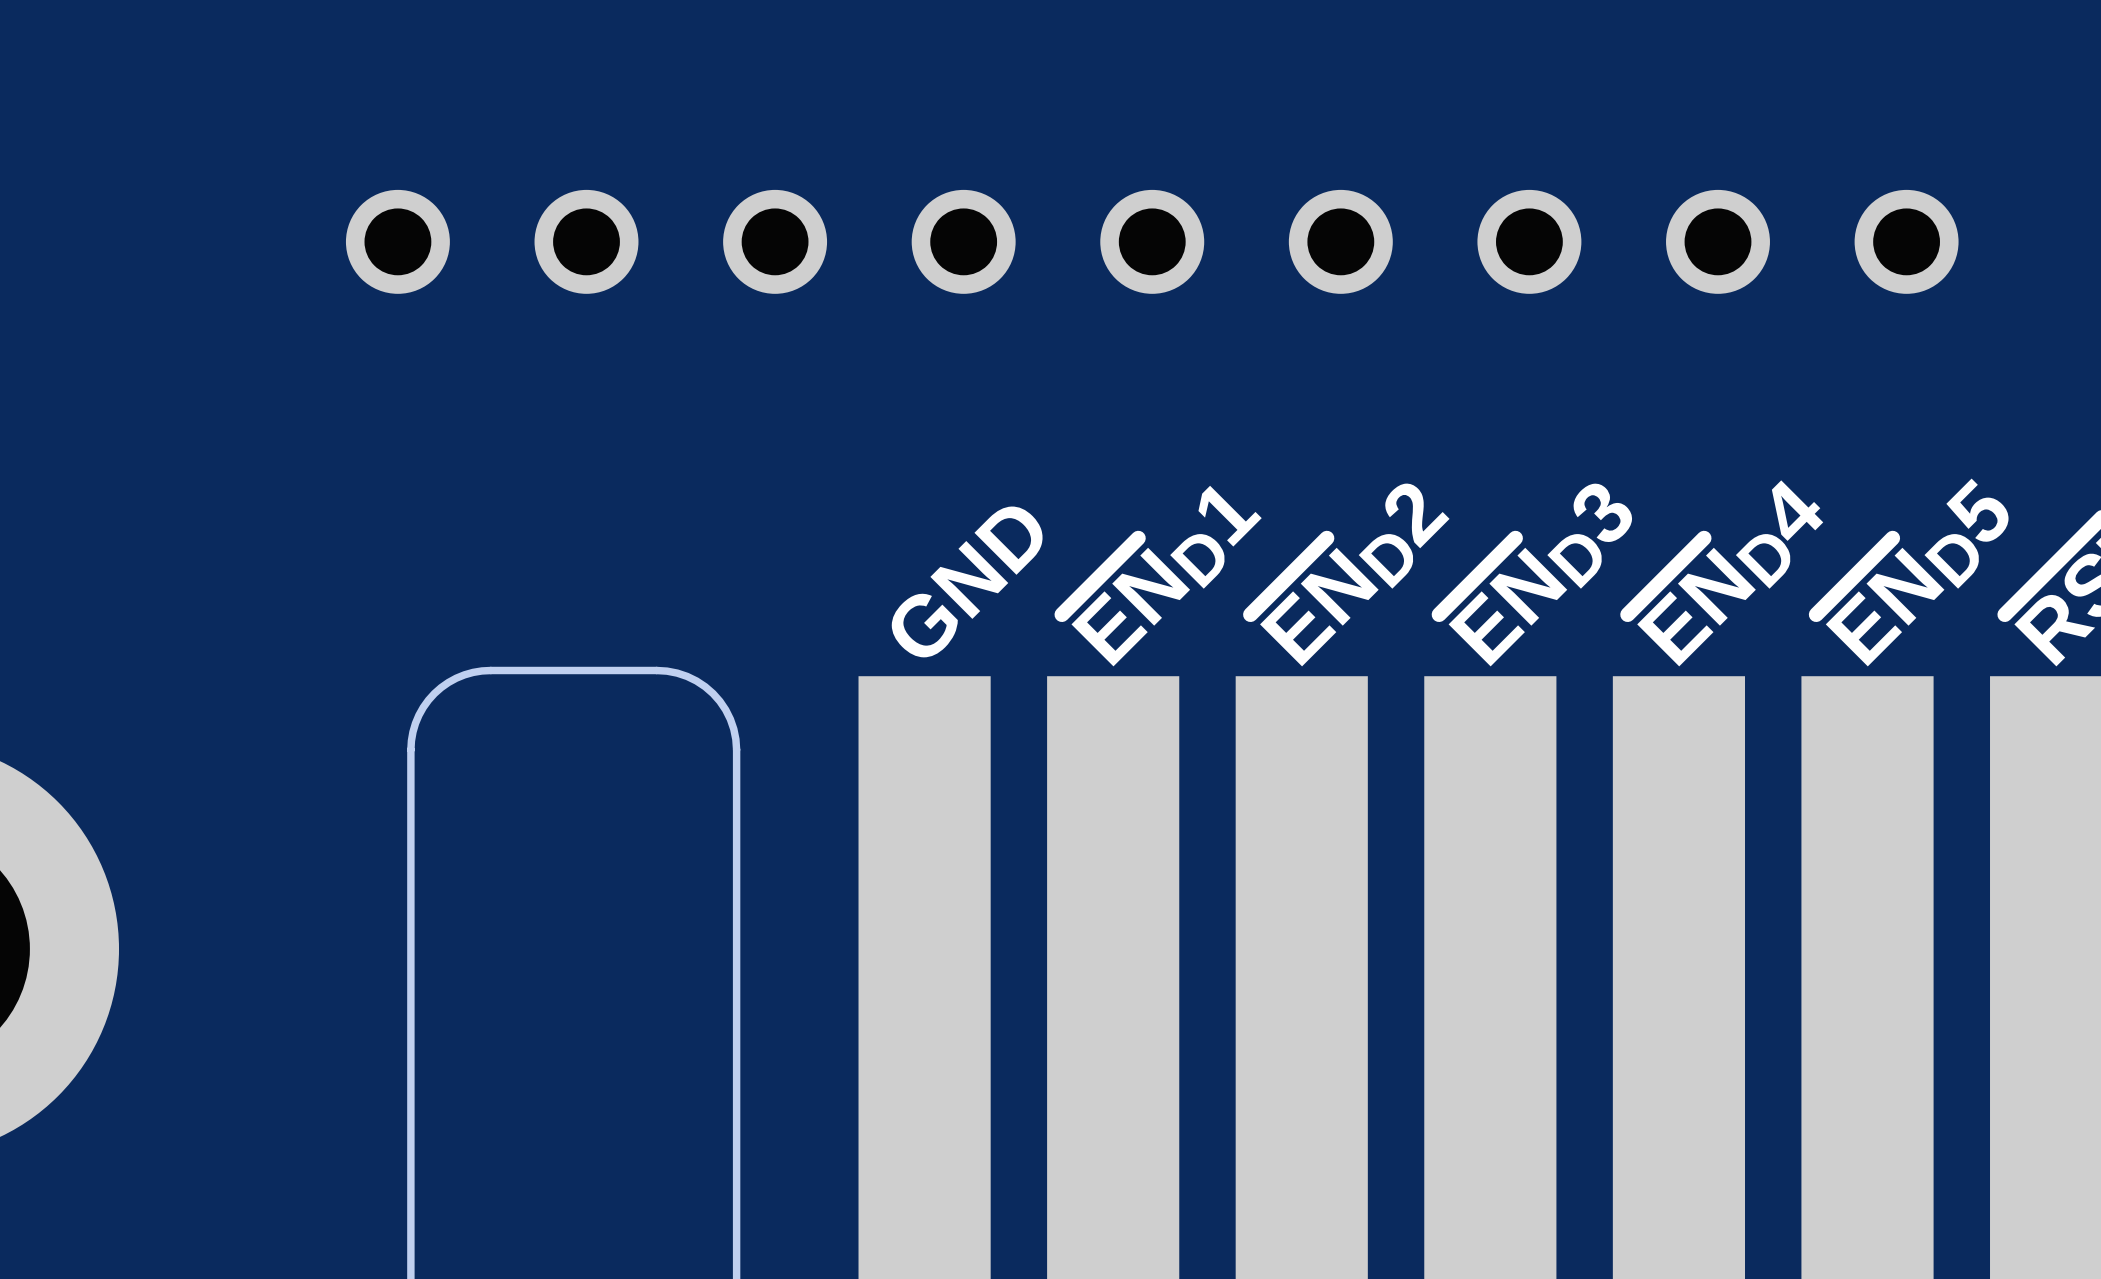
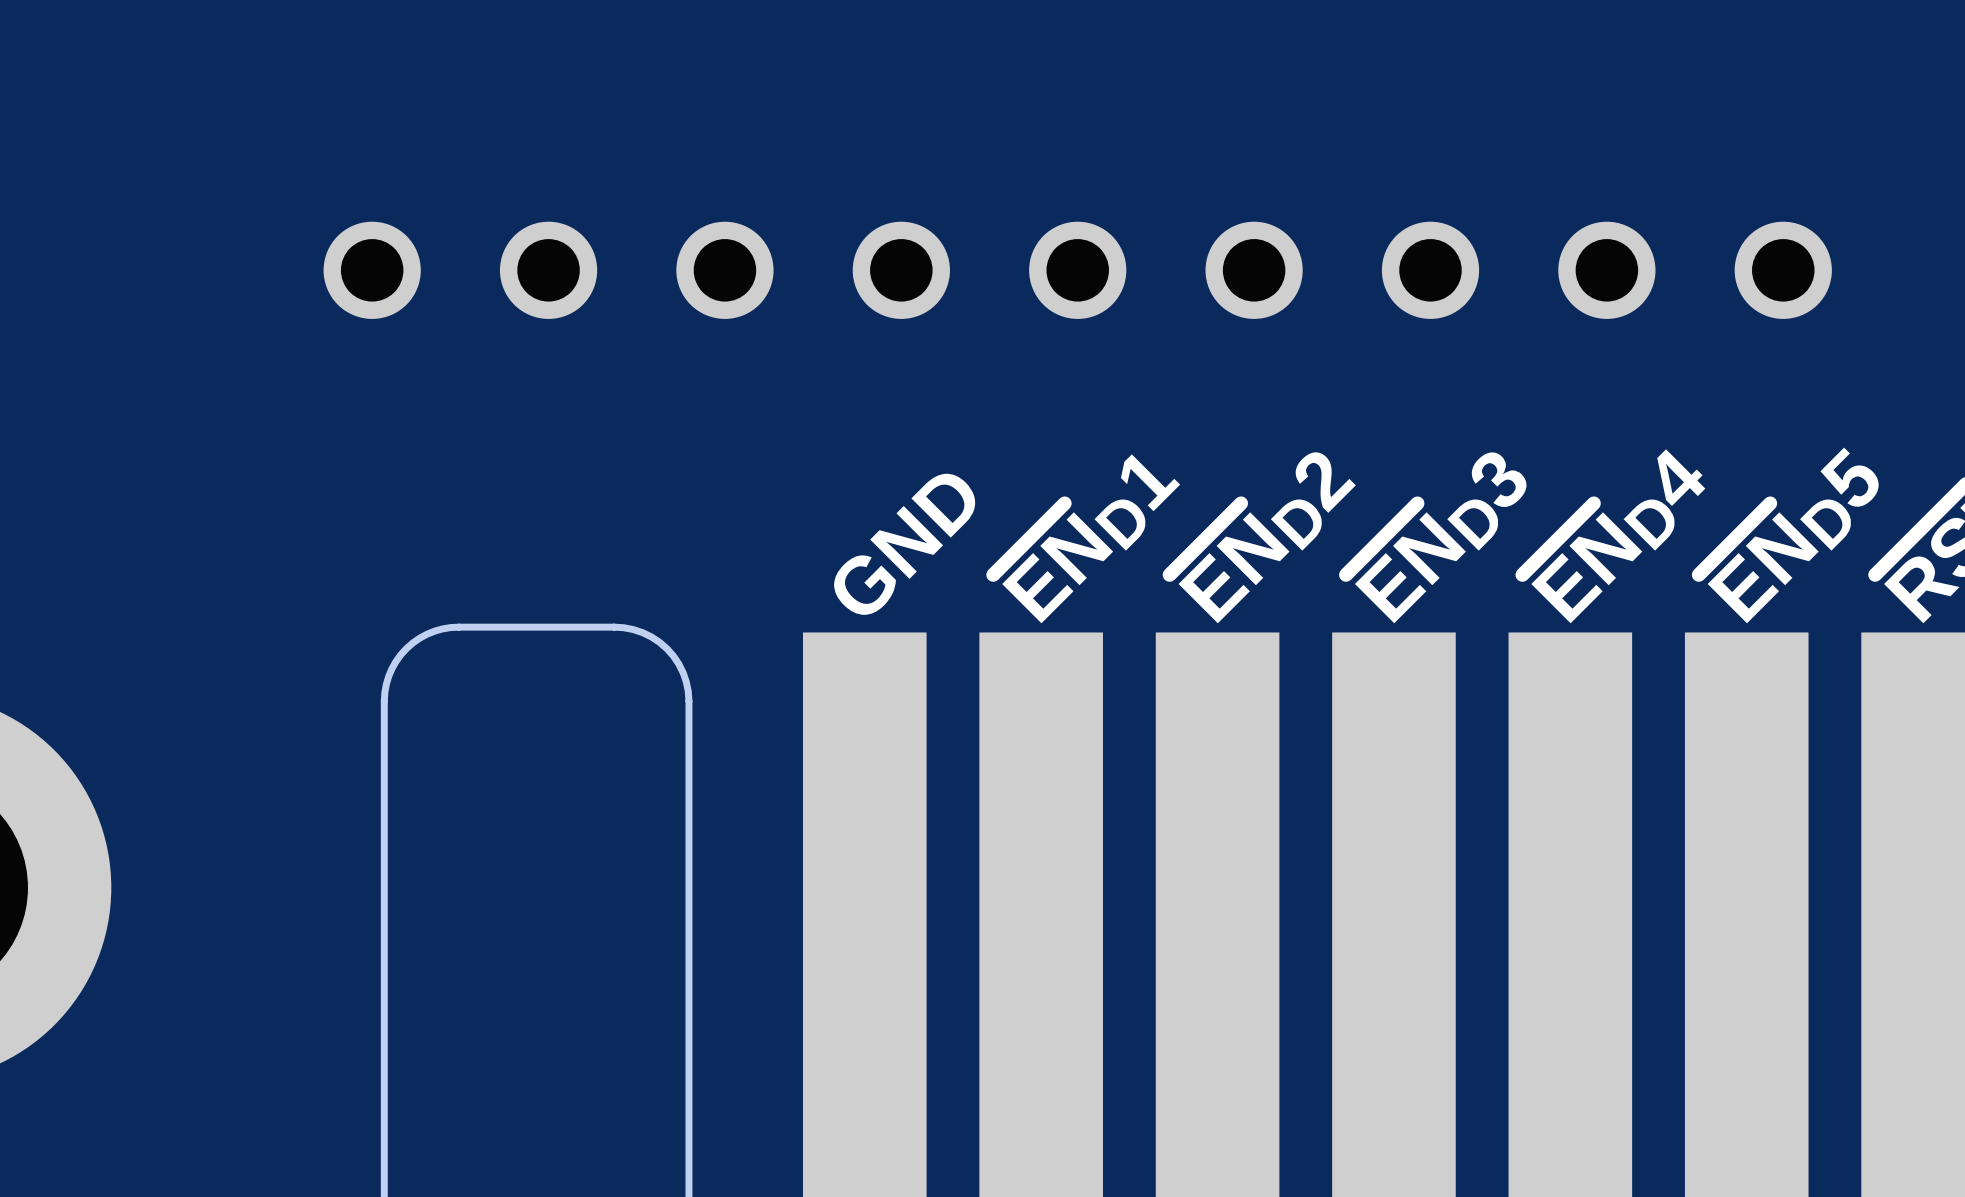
part position: (1152, 241) -> (1077, 270)

